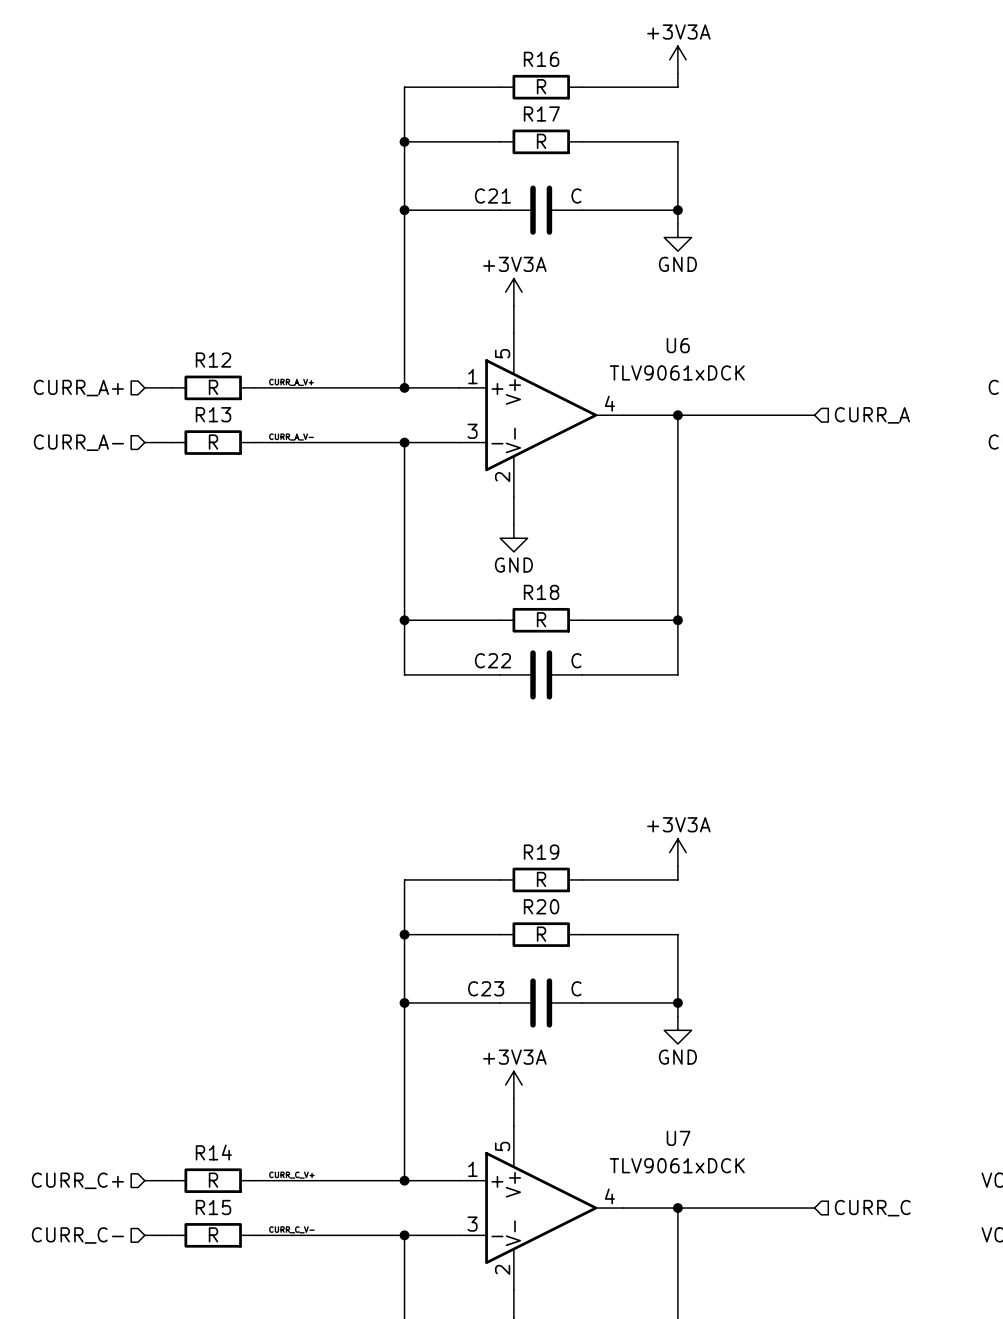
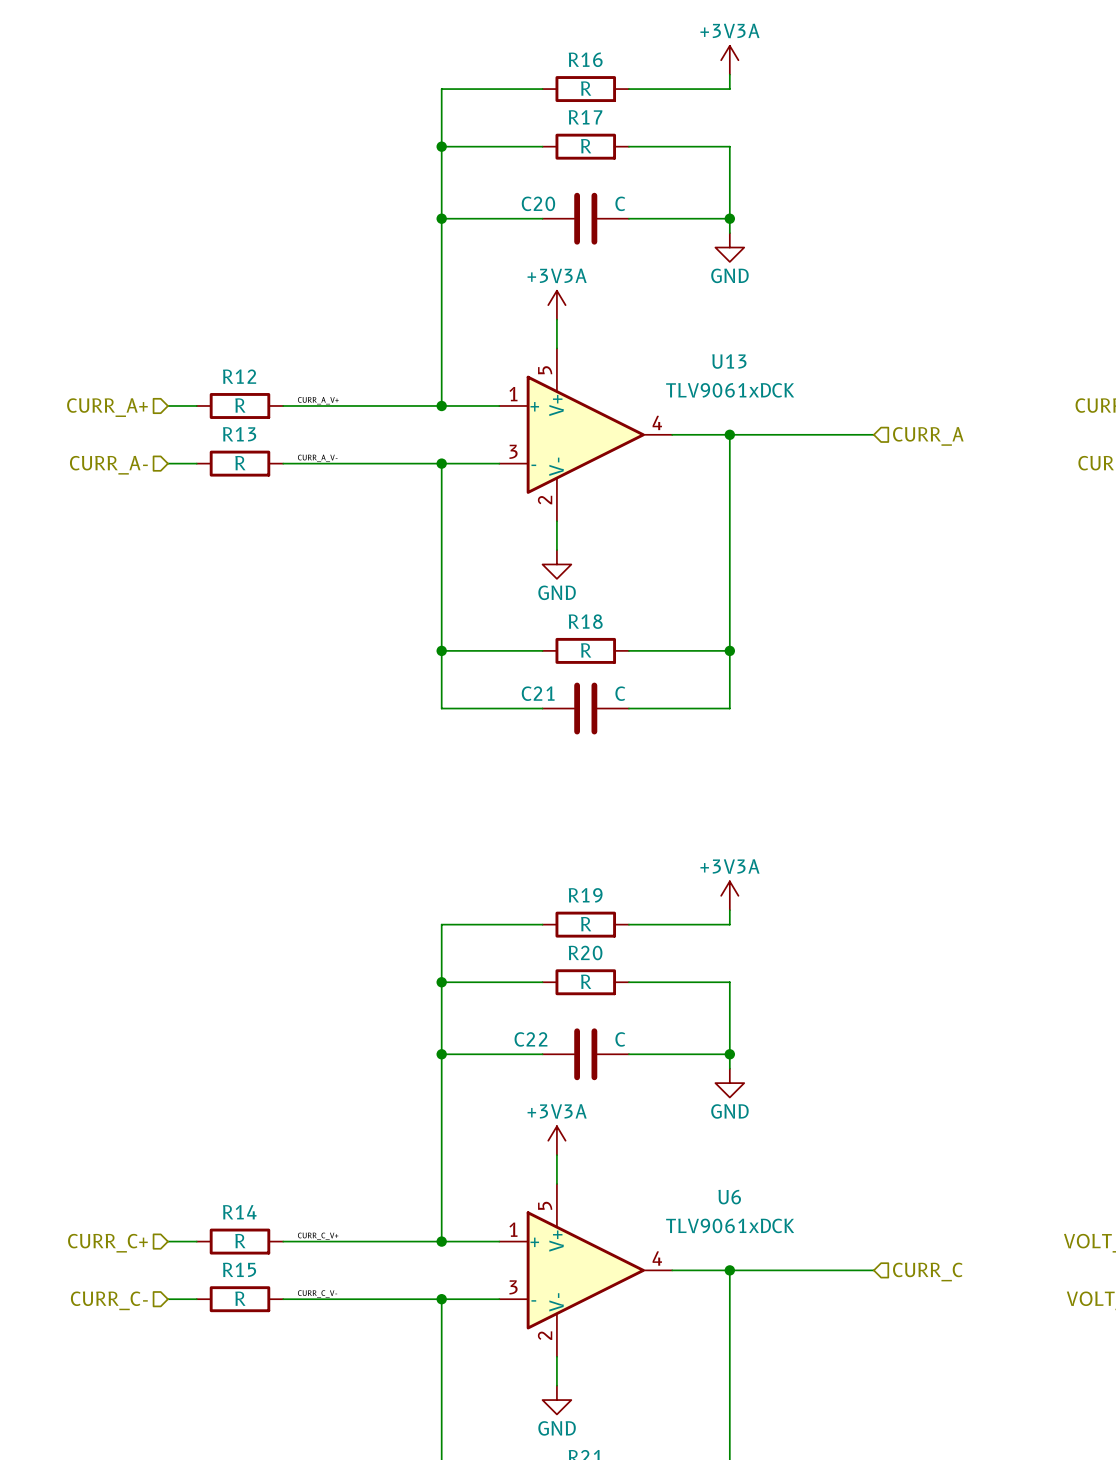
C21 name: C21 (492, 196) -> C20 (538, 203)
U6 name: U6 (678, 345) -> U13 (729, 361)
C22 name: C22 (492, 660) -> C21 (538, 693)
C23 name: C23 (486, 988) -> C22 (530, 1039)
U7 name: U7 (678, 1138) -> U6 (729, 1197)

